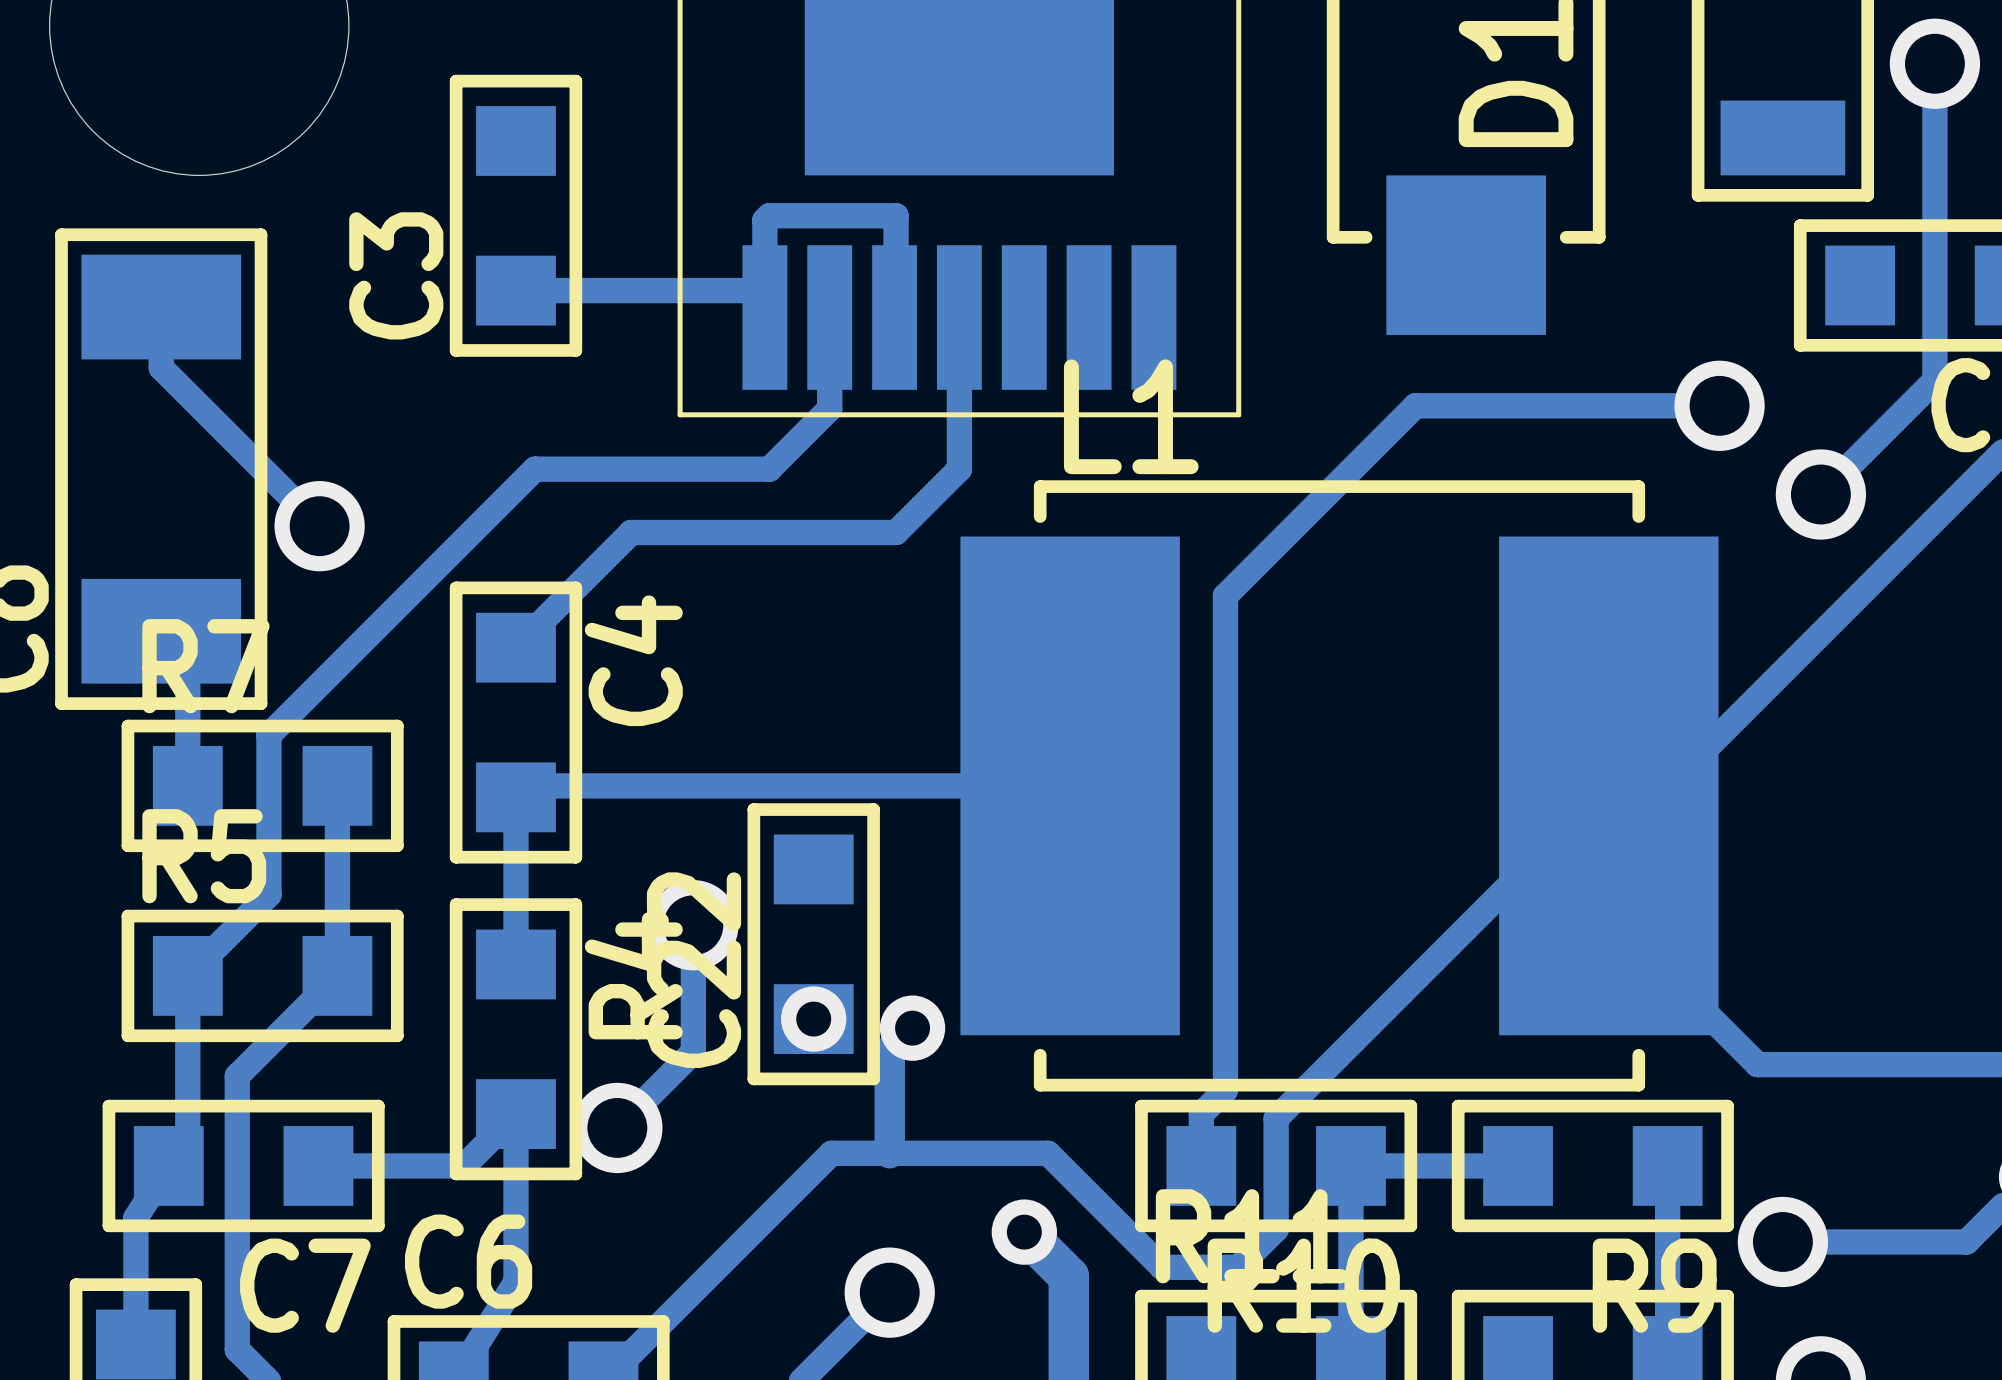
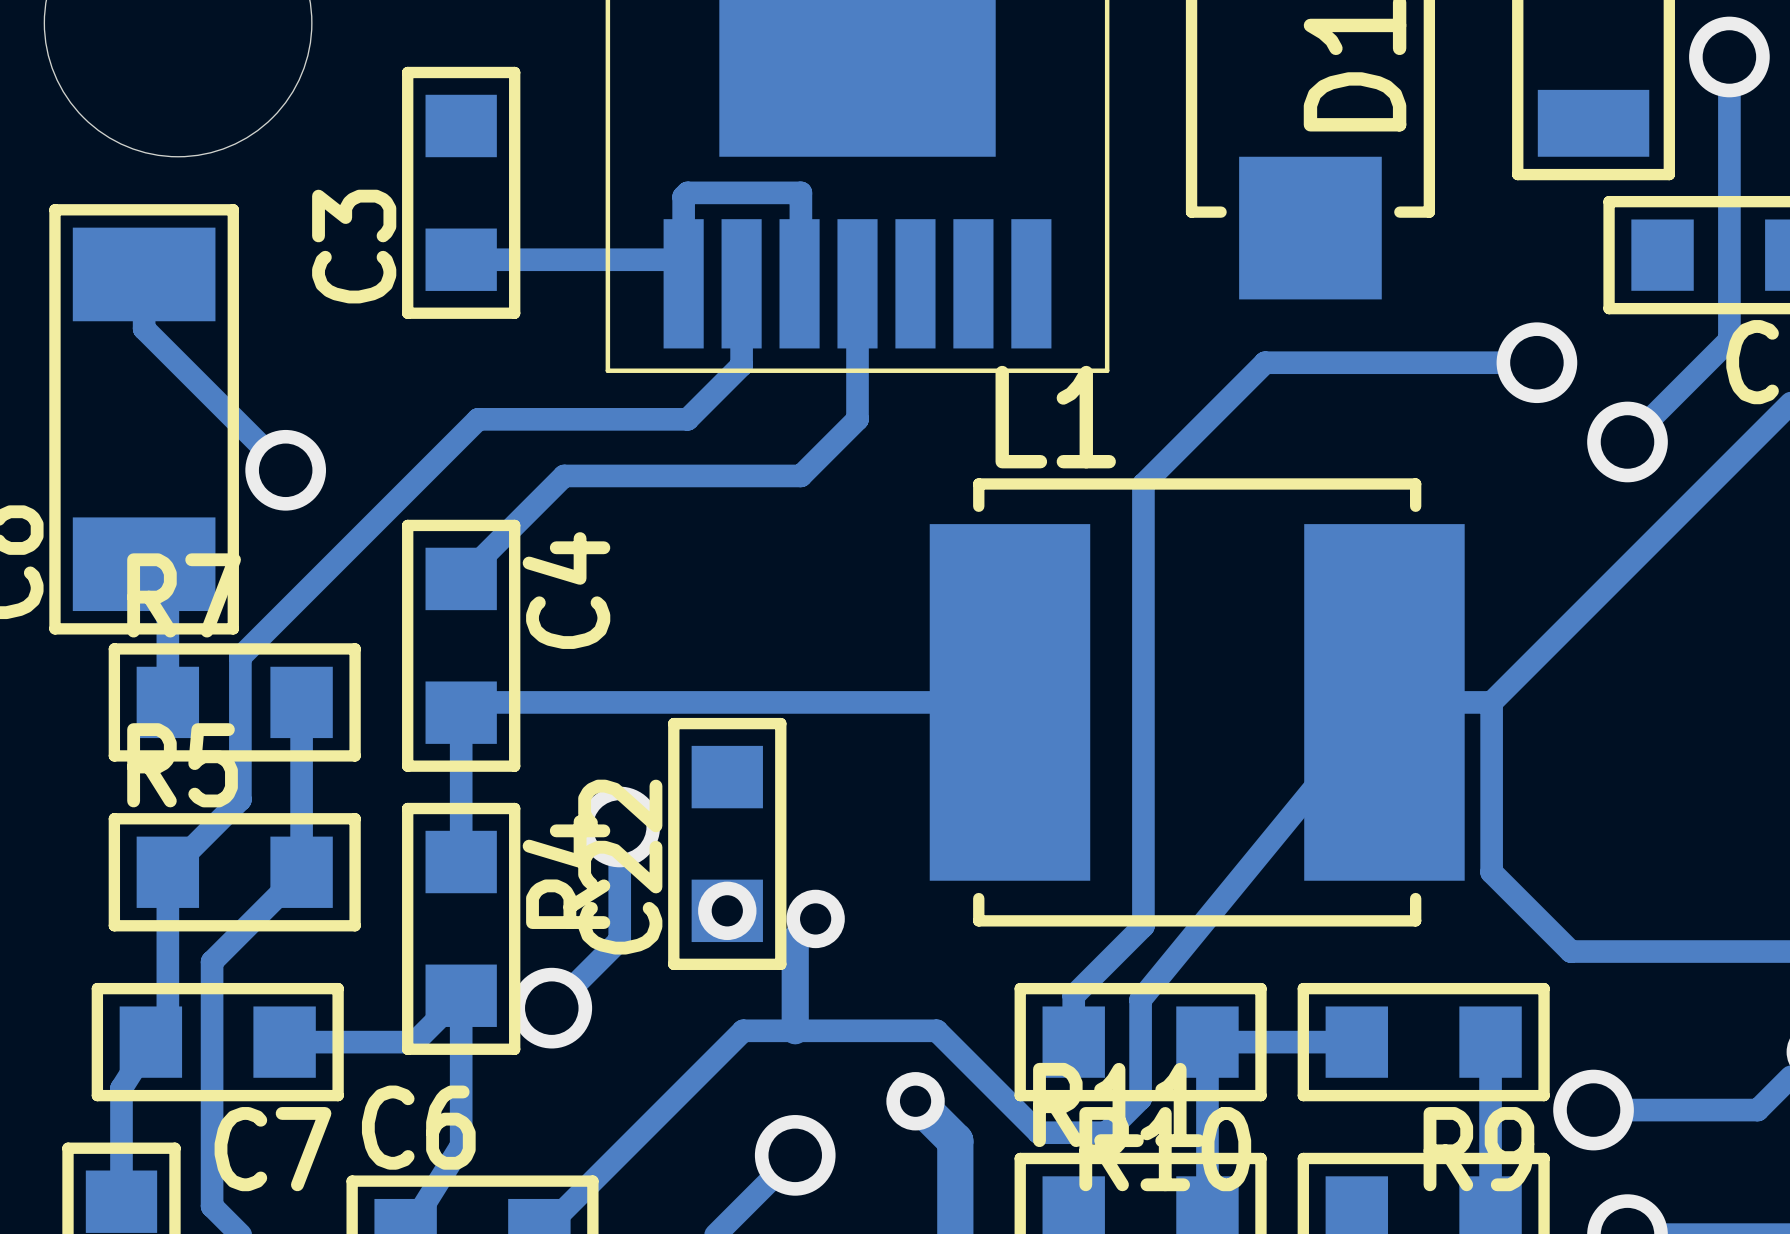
L1 name position: L1 (1131, 416) -> L1 (1055, 417)
L1 footprint: [960, 480, 1719, 1092] -> [929, 478, 1465, 927]
track: (1279, 542) (1225, 595) (1225, 1089) -> (1143, 484) (1143, 926) (1095, 974)
track: (1608, 785) (1276, 1118) -> (1437, 702) (1384, 702) (1140, 999)

